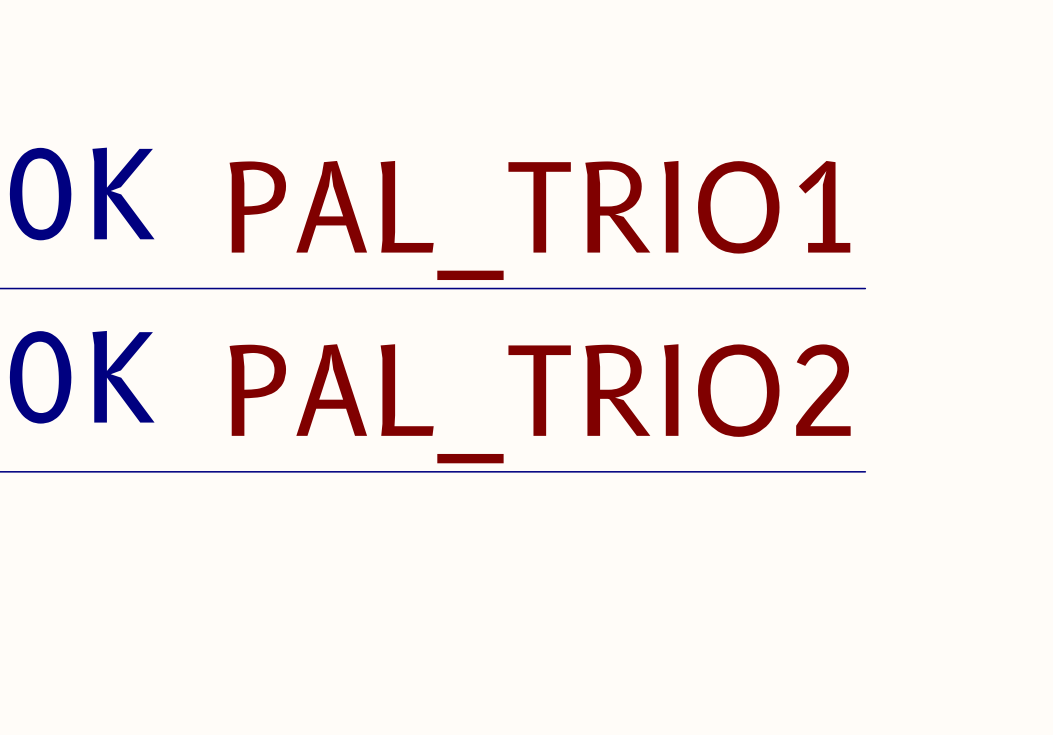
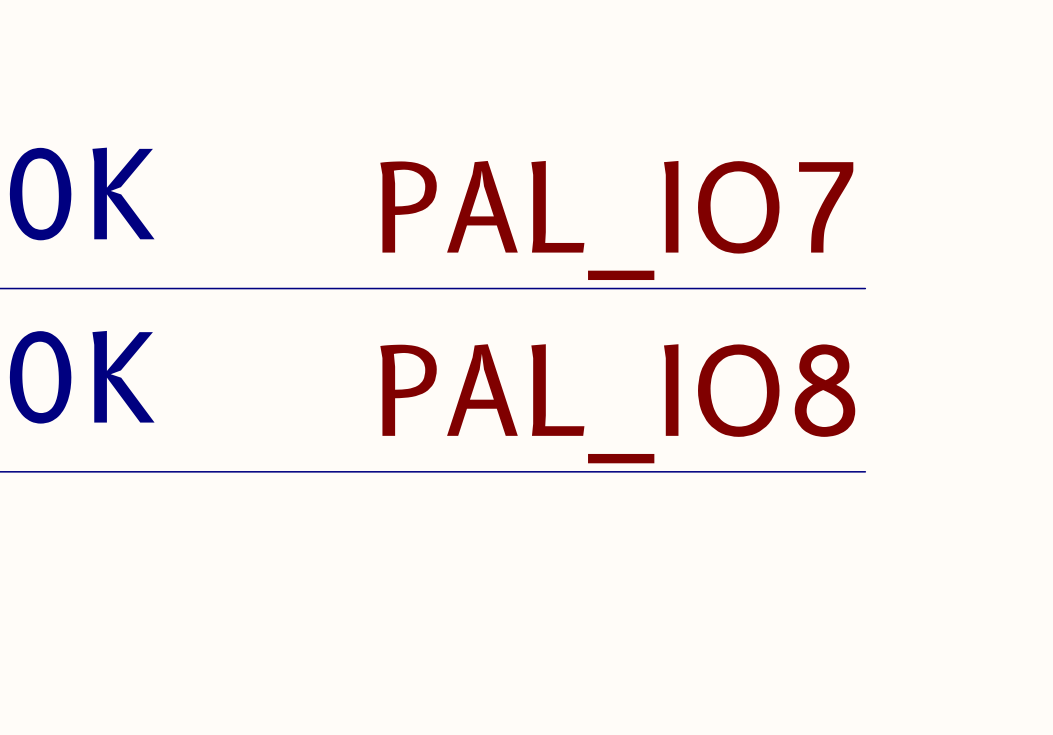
label: PAL_TRIO1 (539, 220) -> PAL_IO7 (616, 220)
label: PAL_TRIO2 (540, 403) -> PAL_IO8 (617, 403)

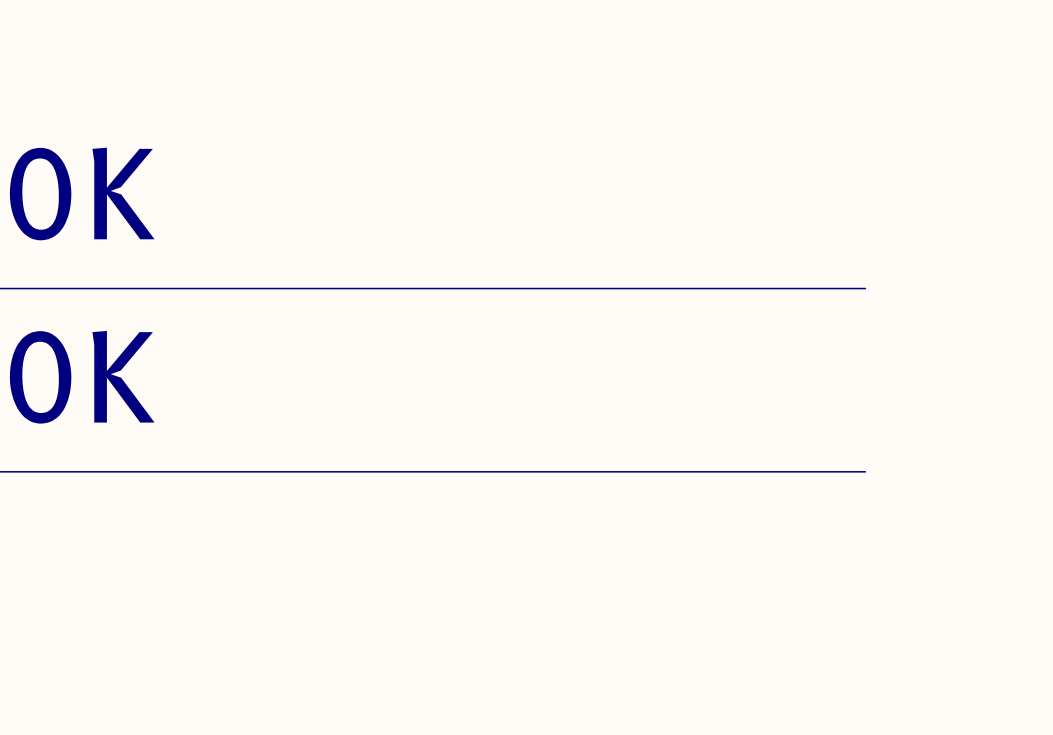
label: PAL_IO7 (616, 220) -> none
label: PAL_IO8 (617, 403) -> none

